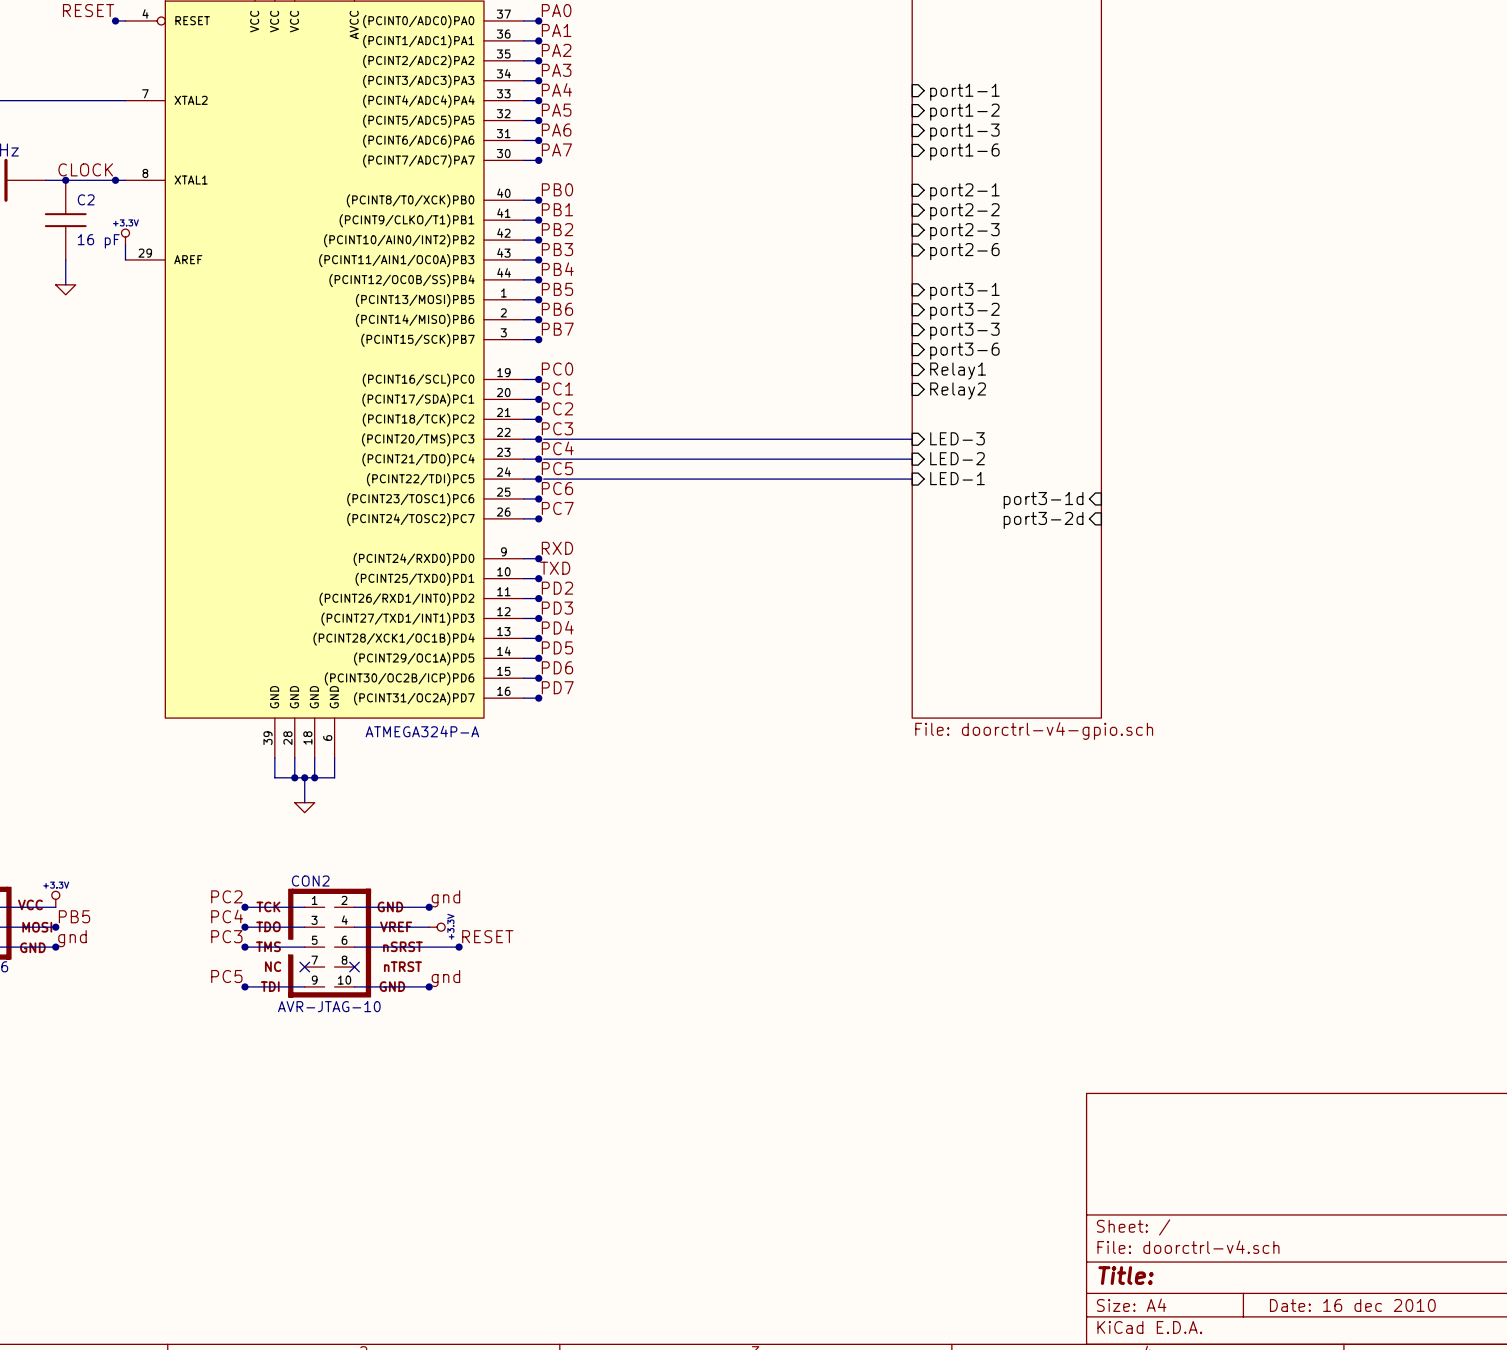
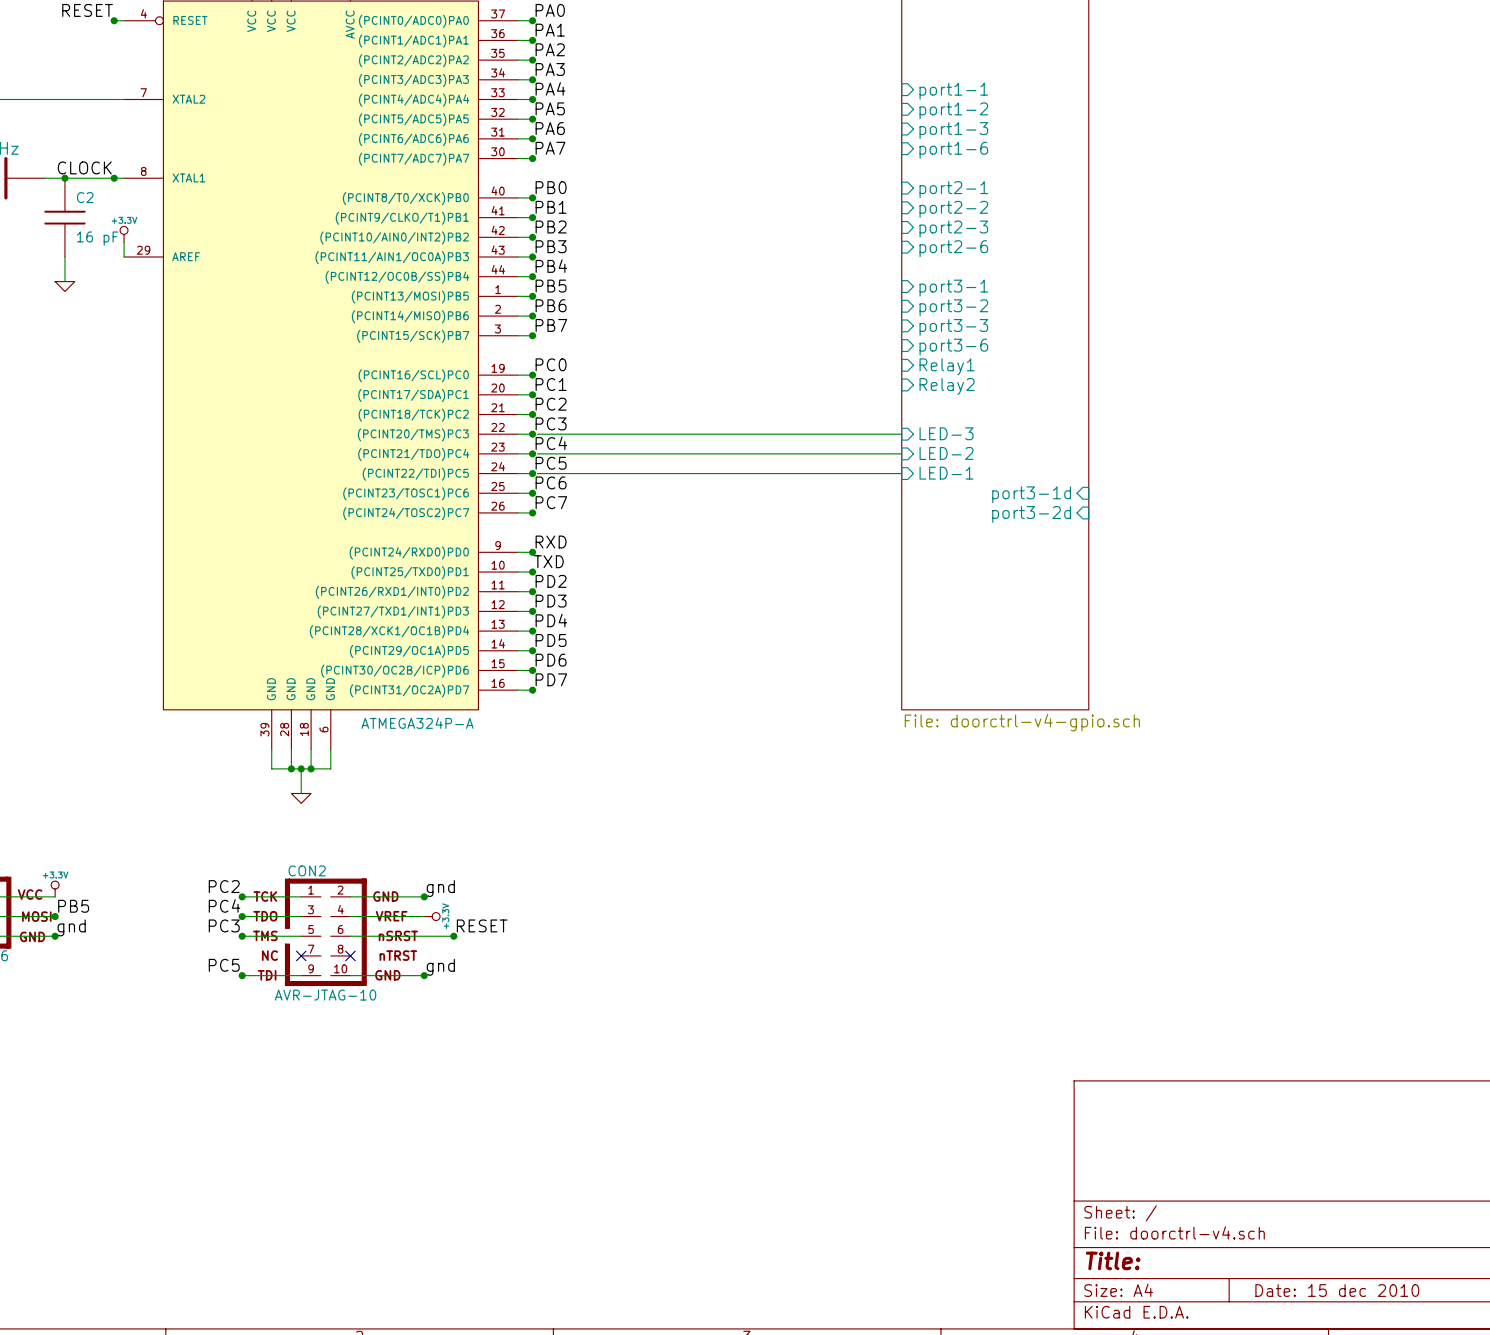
title block: Date: 16 dec 2010 (1352, 1305) -> Date: 15 dec 2010 (1337, 1290)

